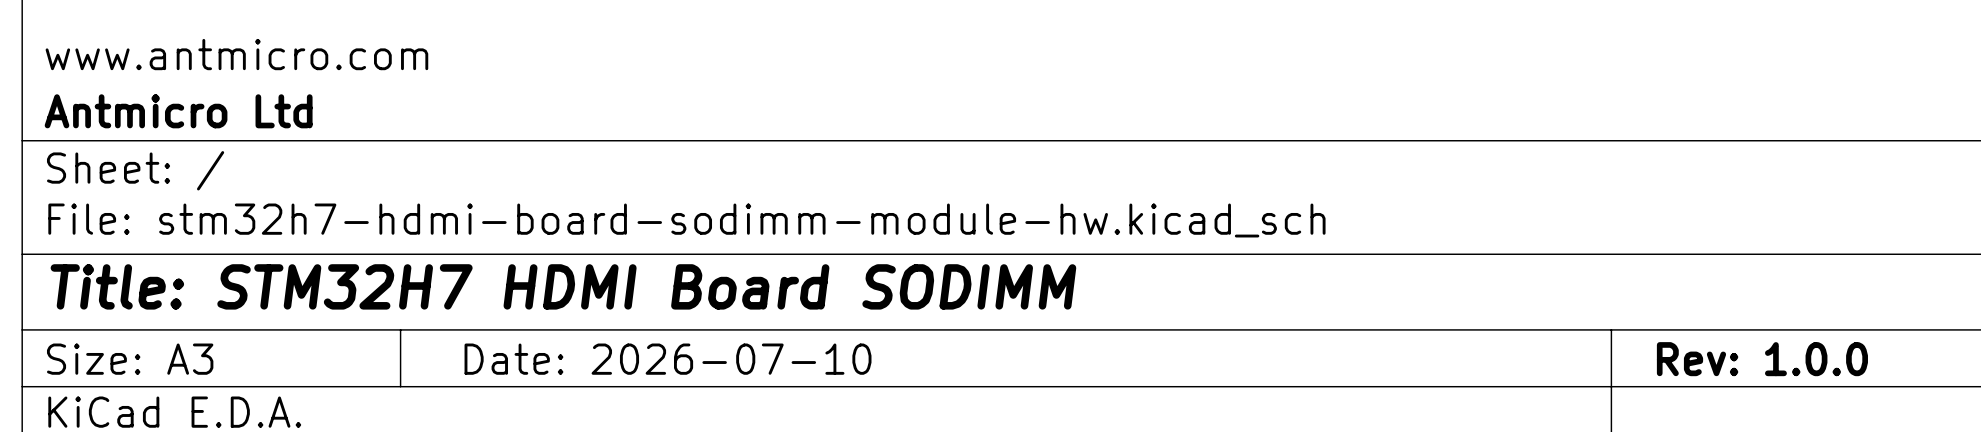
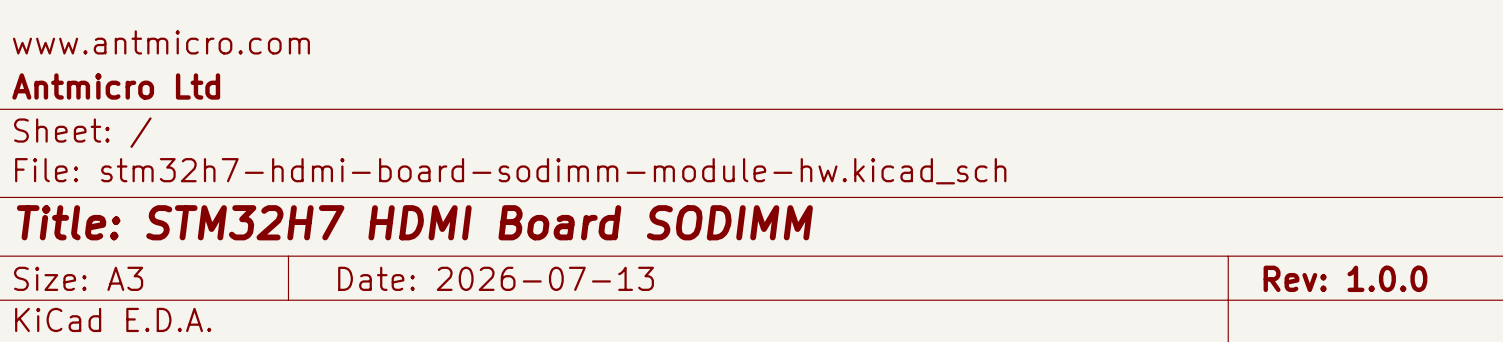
title block: Date: 2026-07-10 (668, 359) -> Date: 2026-07-13 (496, 278)

